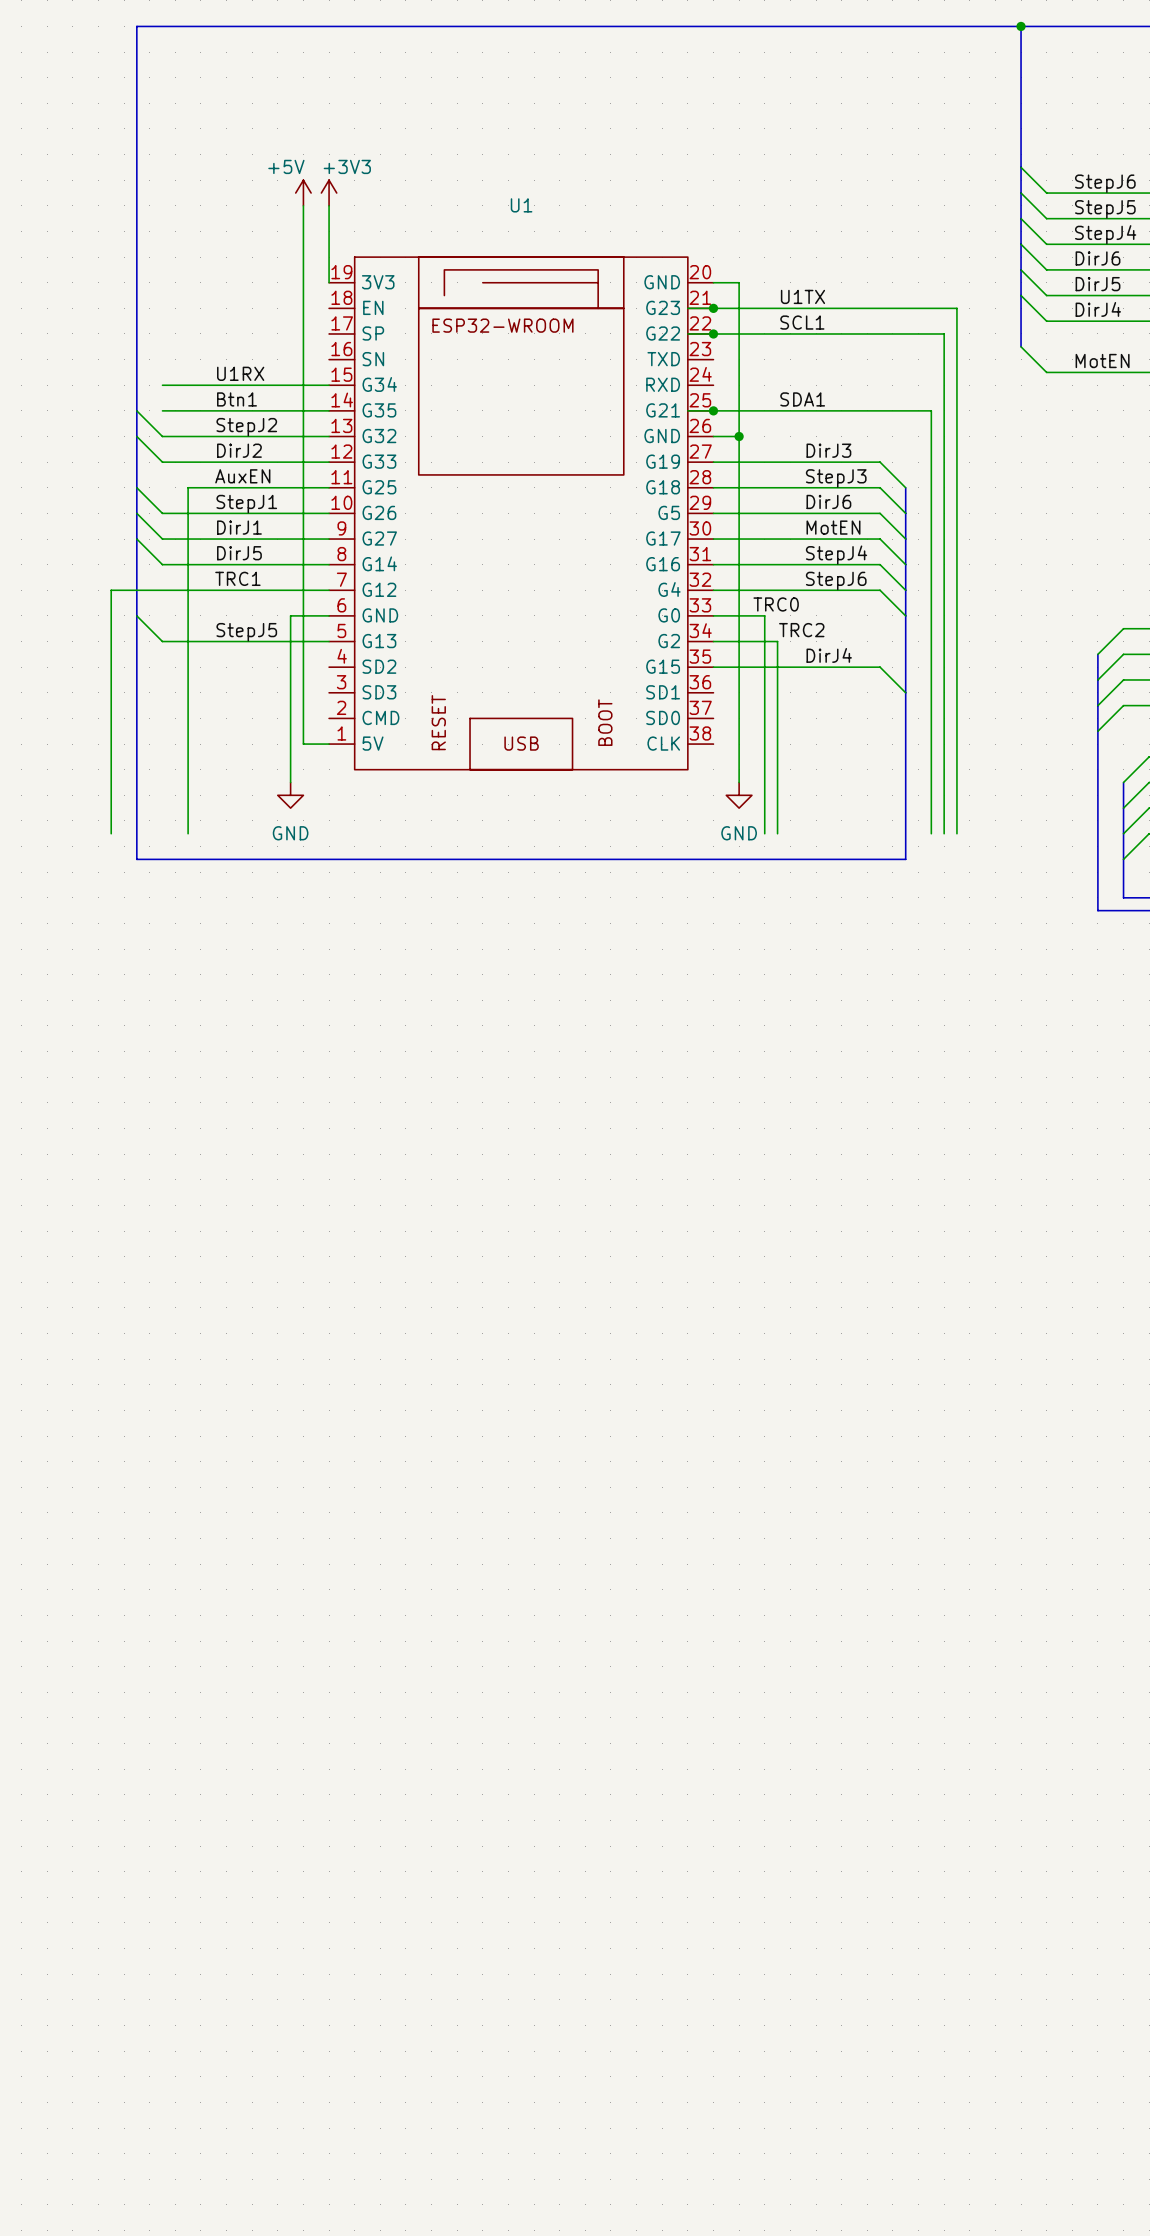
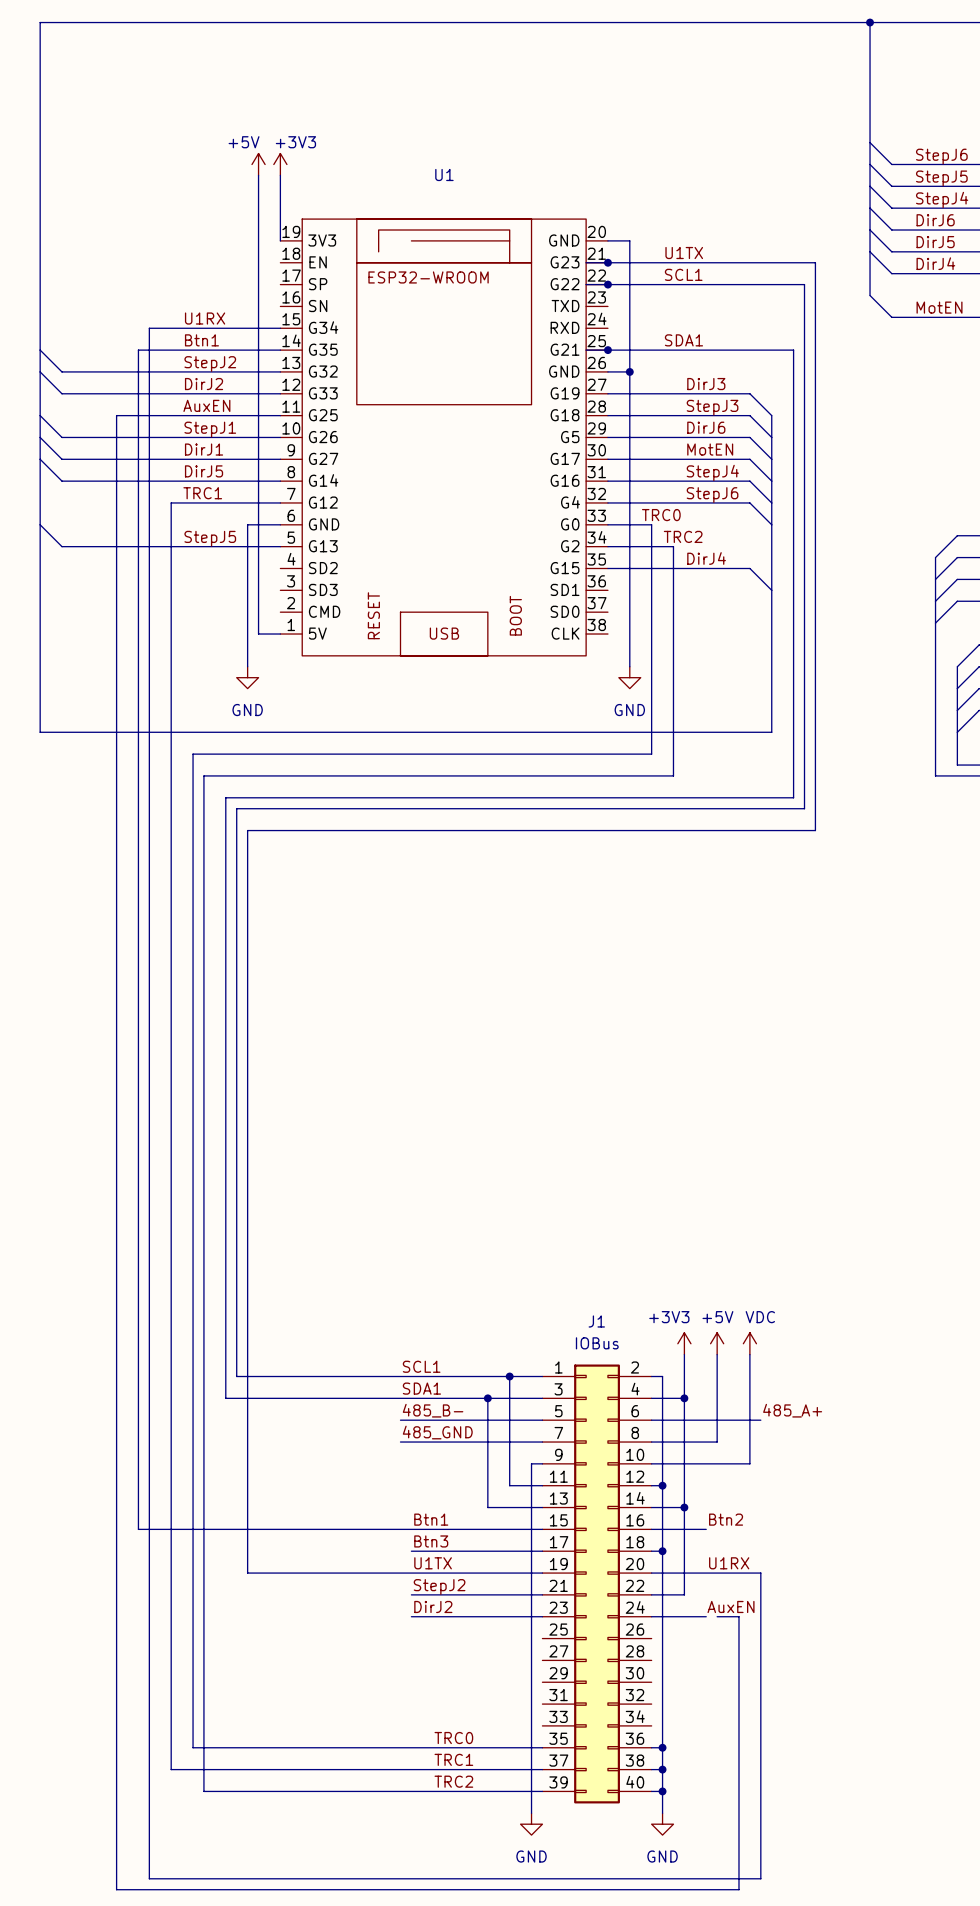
bus: (136, 26) (136, 859) -> (116, 22) (40, 22) (40, 732) (116, 732)
wire: (162, 385) (175, 385) -> (651, 1573) (760, 1573) (760, 1878) (149, 1878) (149, 328)
wire: (136, 410) (162, 436) -> (40, 350) (62, 371) (138, 371)
wire: none -> (138, 350) (138, 1529) (542, 1529)
wire: (136, 436) (162, 462) -> (40, 371) (62, 393) (138, 393)
wire: (136, 487) (162, 513) -> (40, 415) (62, 437) (138, 437)
wire: (188, 487) (188, 833) -> (160, 415) (116, 415) (116, 1889) (738, 1889) (738, 1616) (717, 1616)
wire: (136, 513) (162, 539) -> (40, 437) (62, 459) (138, 459)
wire: (136, 539) (162, 564) -> (40, 459) (62, 481) (138, 481)
wire: (200, 590) (111, 590) (111, 833) -> (171, 502) (171, 1769) (542, 1769)
wire: (136, 615) (162, 641) -> (40, 524) (62, 546) (138, 546)
wire: (777, 641) (777, 833) -> (662, 546) (673, 546) (673, 775) (203, 775) (203, 1791) (542, 1791)
wire: none -> (651, 710) (651, 754) (193, 754) (193, 1747) (542, 1747)
wire: none -> (793, 710) (793, 797) (225, 797) (225, 1398) (542, 1398)
wire: none -> (804, 710) (804, 808) (236, 808) (236, 1376) (542, 1376)
wire: none -> (815, 710) (815, 830) (247, 830) (247, 1573) (542, 1573)
power symbol: none -> +3V3 (684, 1343)
power symbol: none -> +5V (717, 1343)
power symbol: none -> VDC (749, 1343)
wire: none -> (684, 1354) (684, 1594) (651, 1594)
wire: none -> (717, 1354) (717, 1442) (651, 1442)
wire: none -> (749, 1354) (749, 1463) (651, 1463)
label: none -> SCL1 (421, 1366)
wire: none -> (509, 1376) (509, 1485) (542, 1485)
junction: none -> (509, 1376)
wire: none -> (651, 1376) (662, 1376) (662, 1813)
label: none -> SDA1 (421, 1388)
wire: none -> (487, 1398) (487, 1507) (542, 1507)
junction: none -> (487, 1398)
wire: none -> (651, 1398) (684, 1398)
junction: none -> (684, 1398)
label: none -> 485_B- (433, 1410)
label: none -> 485_A+ (792, 1410)
wire: none -> (400, 1420) (542, 1420)
wire: none -> (651, 1420) (760, 1420)
label: none -> 485_GND (437, 1432)
wire: none -> (400, 1442) (542, 1442)
wire: none -> (542, 1463) (531, 1463) (531, 1813)
wire: none -> (651, 1485) (662, 1485)
junction: none -> (662, 1485)
wire: none -> (651, 1507) (684, 1507)
junction: none -> (684, 1507)
label: none -> Btn1 (431, 1519)
label: none -> Btn2 (726, 1519)
wire: none -> (651, 1529) (706, 1529)
label: none -> Btn3 (431, 1541)
wire: none -> (411, 1551) (542, 1551)
wire: none -> (651, 1551) (662, 1551)
junction: none -> (662, 1551)
label: none -> U1TX (433, 1563)
label: none -> U1RX (729, 1563)
J1: none -> IOBus (597, 1583)
label: none -> StepJ2 (439, 1586)
wire: none -> (411, 1594) (542, 1594)
label: none -> DirJ2 (433, 1606)
label: none -> AuxEN (731, 1606)
wire: none -> (411, 1616) (542, 1616)
wire: none -> (651, 1616) (706, 1616)
label: none -> TRC0 (453, 1738)
wire: none -> (651, 1747) (662, 1747)
junction: none -> (662, 1747)
label: none -> TRC1 (453, 1759)
wire: none -> (651, 1769) (662, 1769)
junction: none -> (662, 1769)
label: none -> TRC2 (453, 1781)
wire: none -> (651, 1791) (662, 1791)
junction: none -> (662, 1791)
power symbol: none -> GND (531, 1824)
power symbol: none -> GND (662, 1824)

